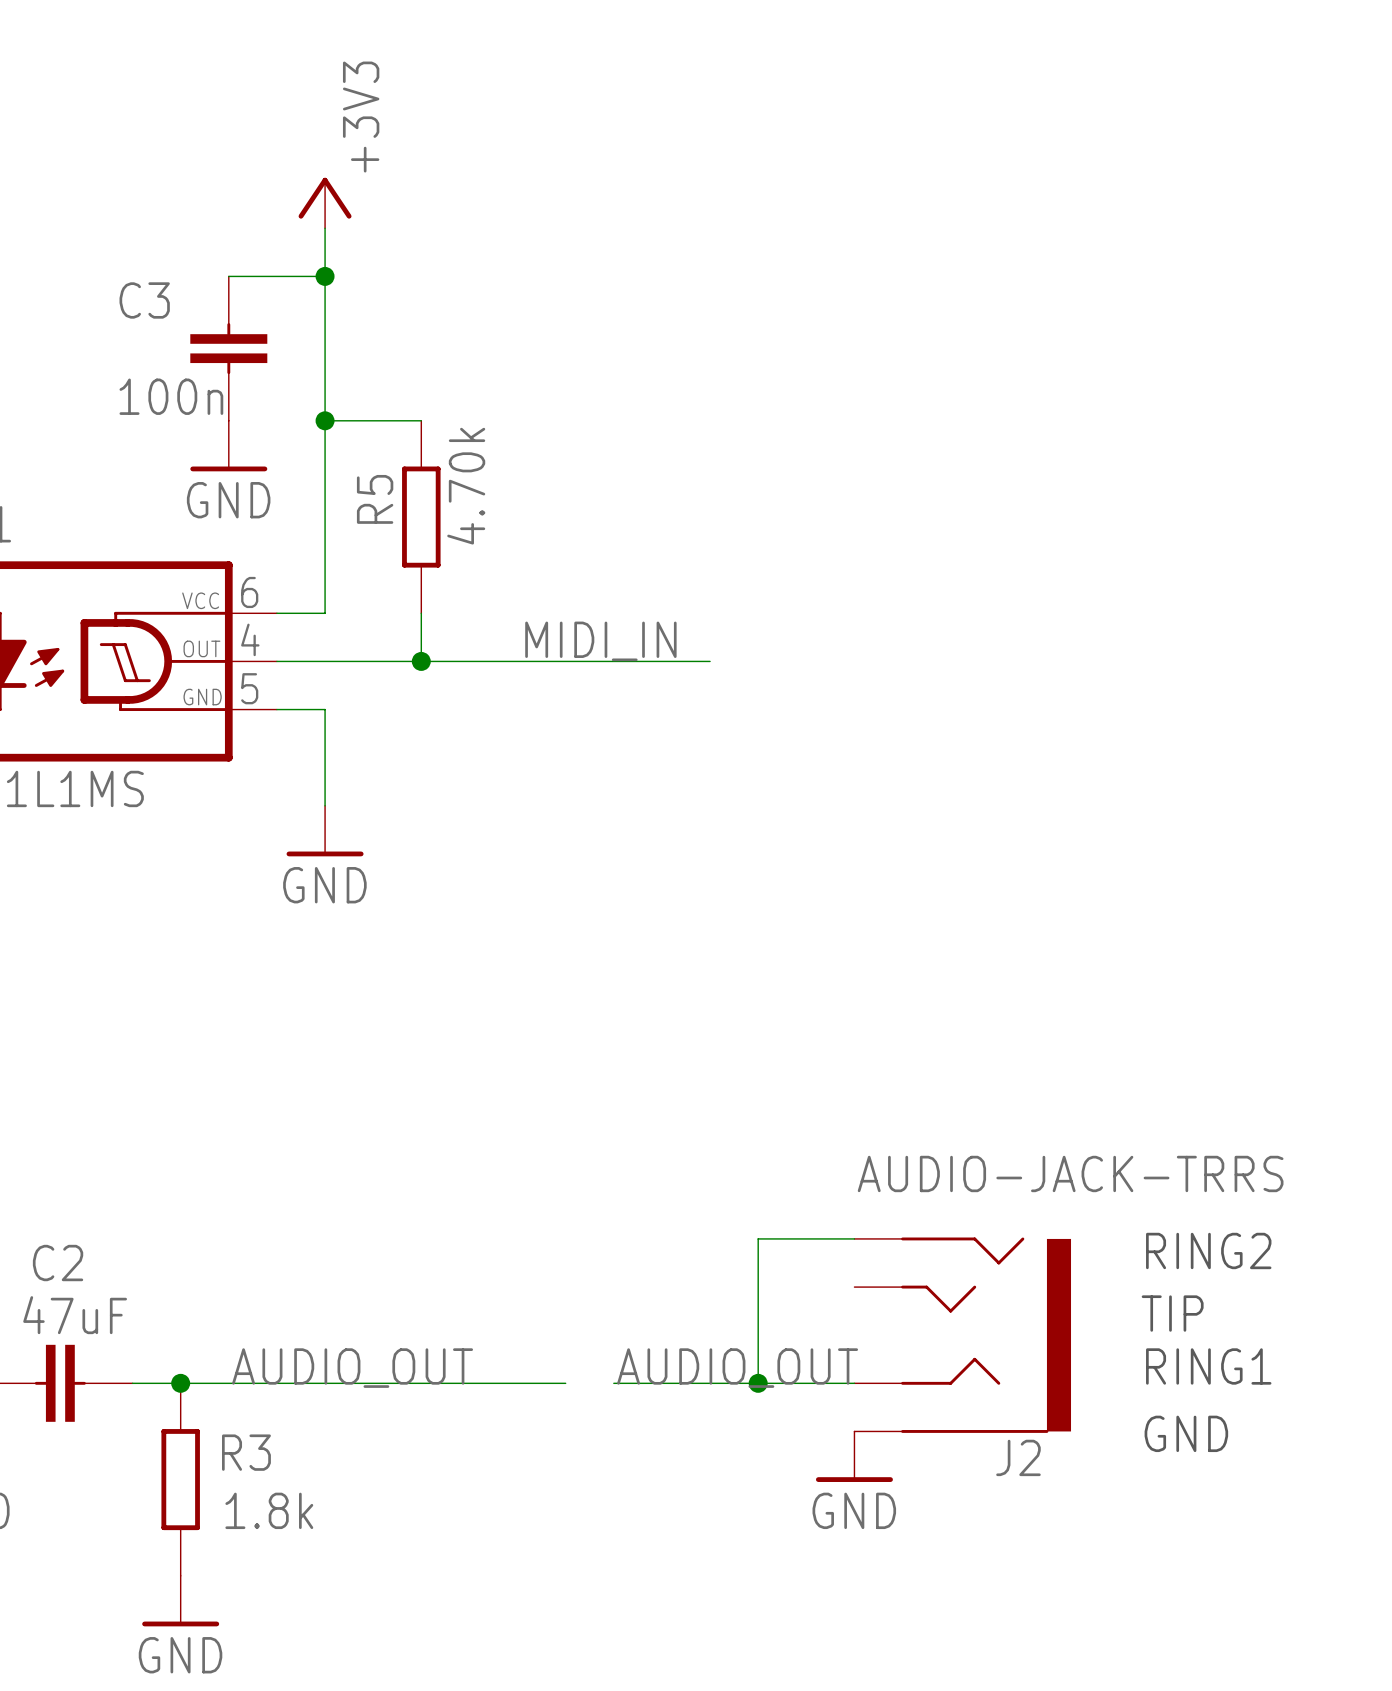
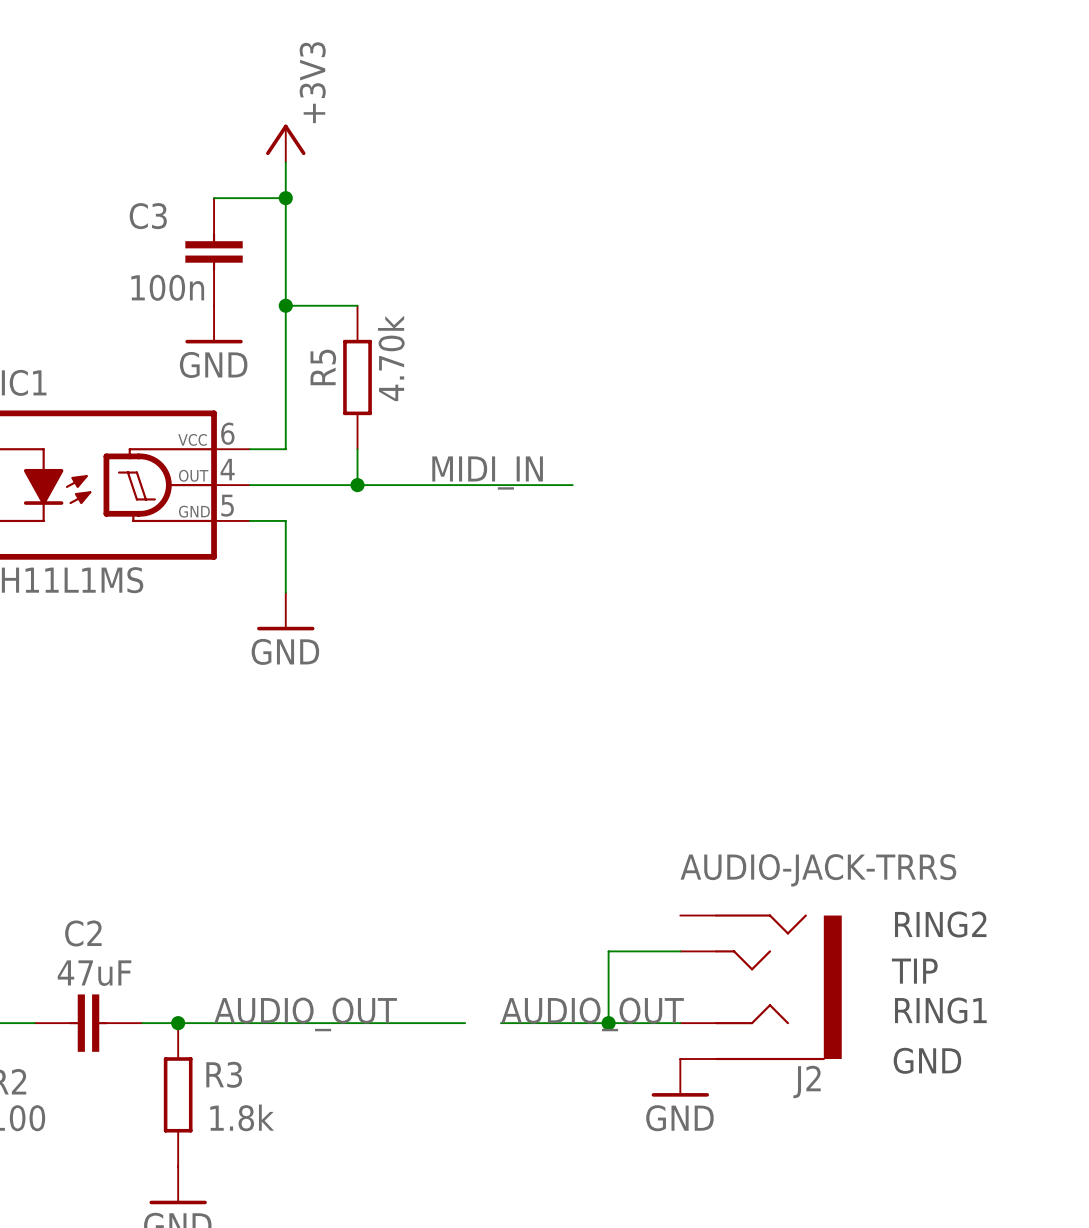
wire: (854, 1238) (758, 1238) (758, 1287) -> (680, 951) (608, 951)

